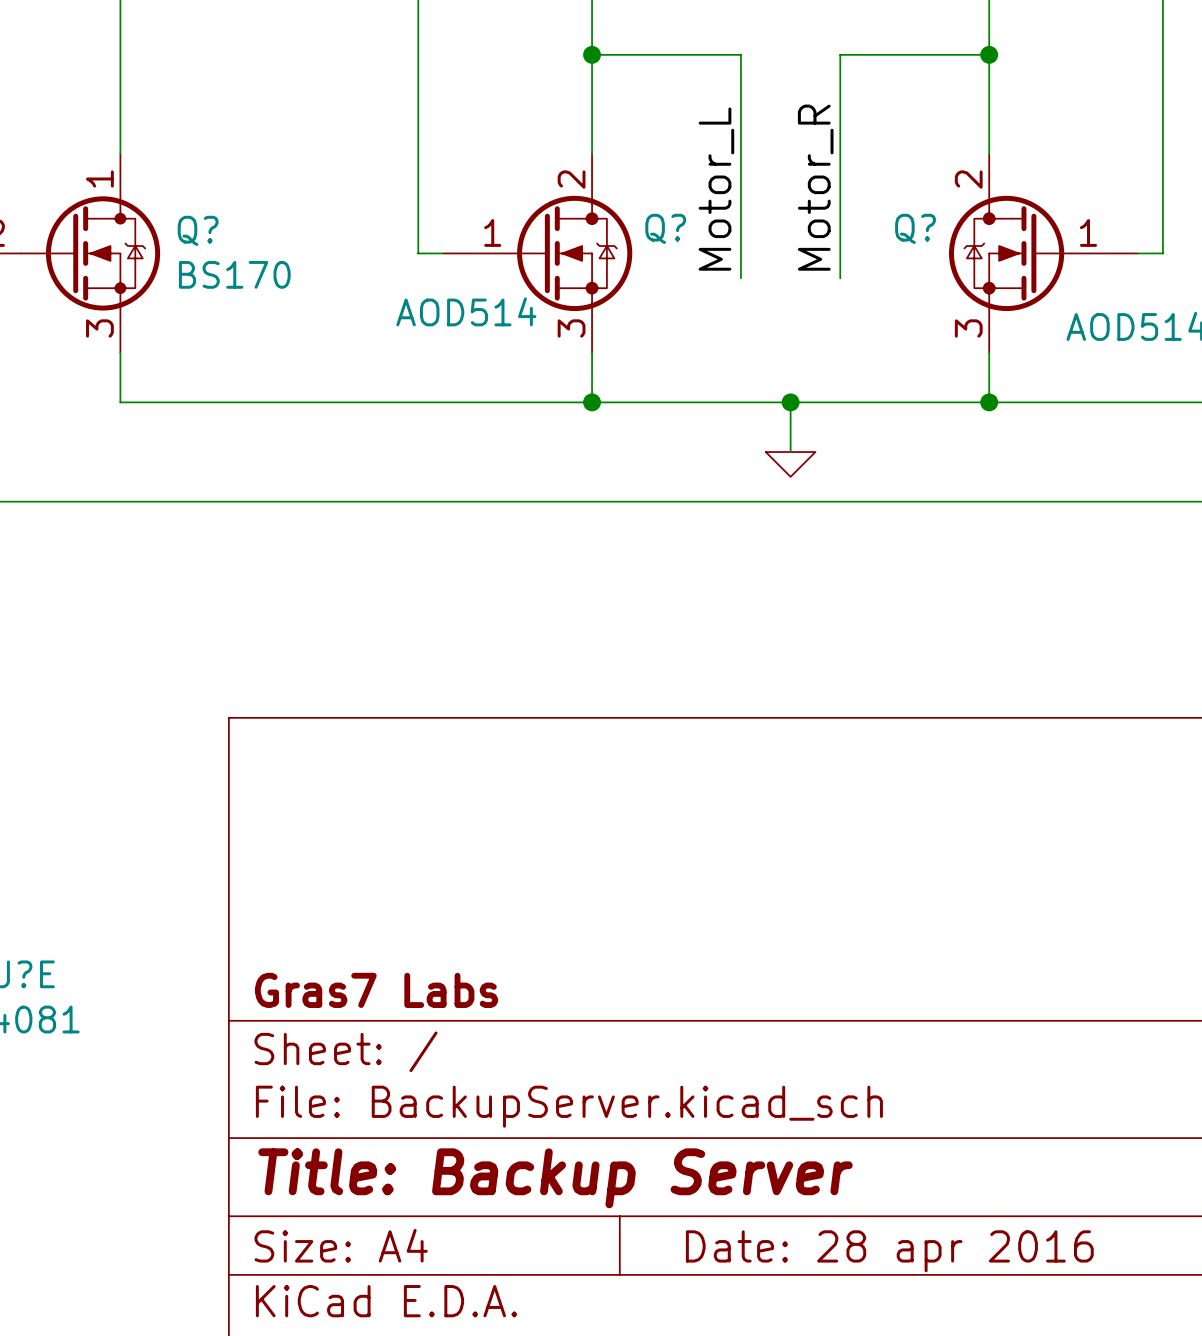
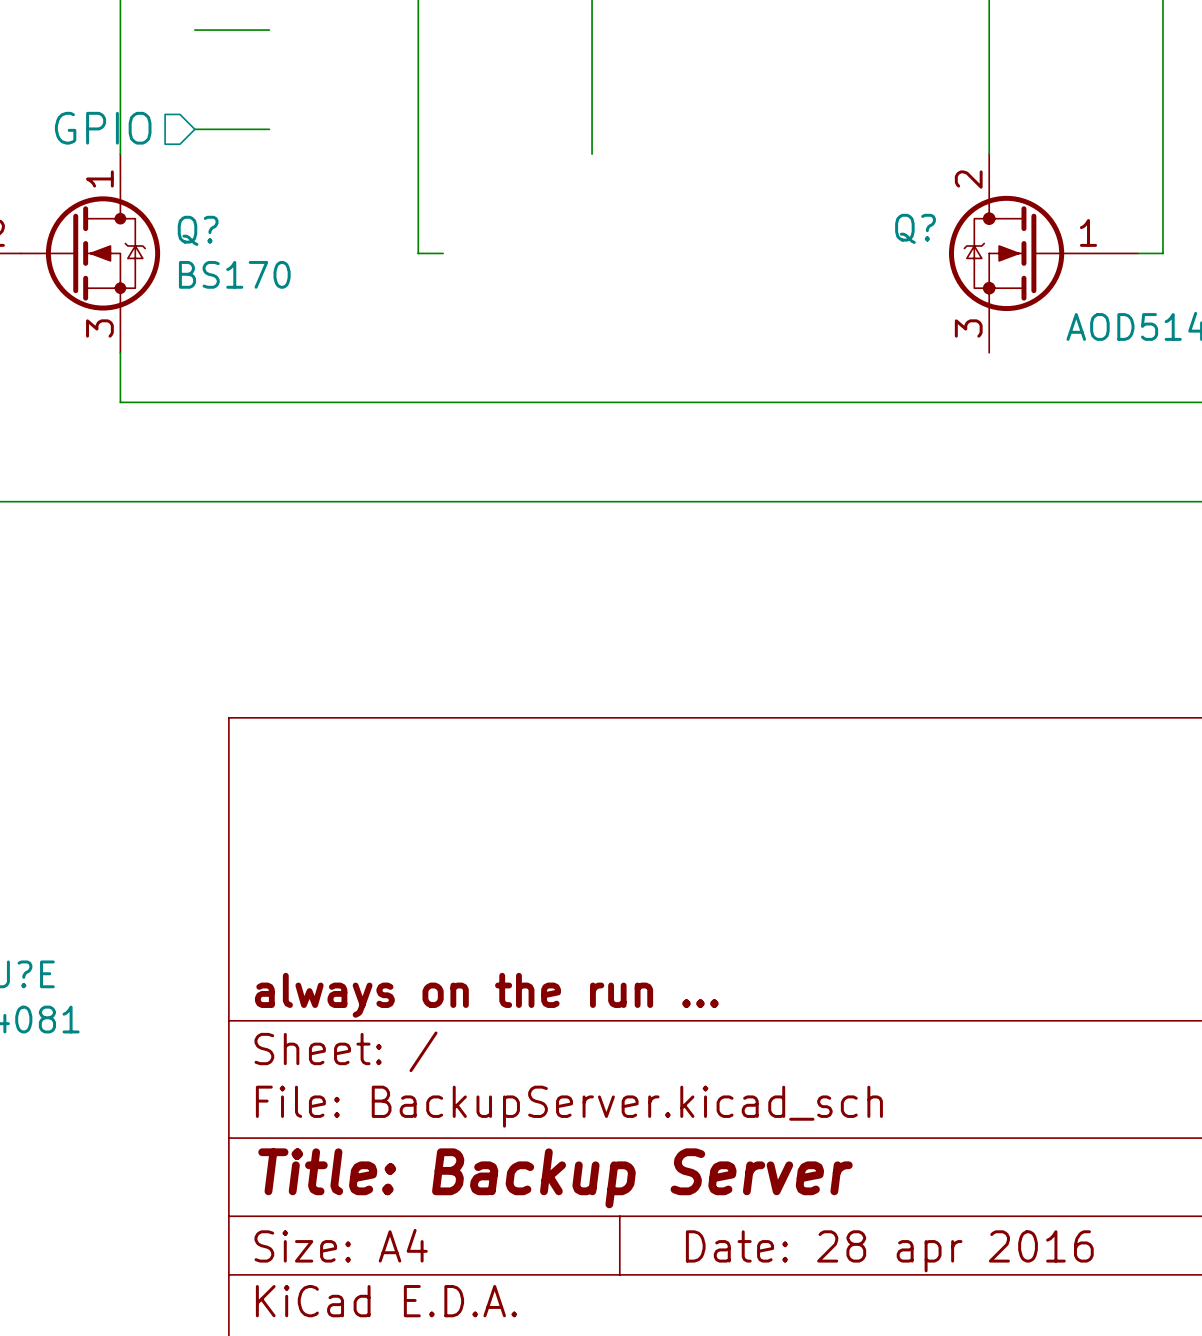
wire: none -> (194, 30) (269, 30)
wire: (592, 54) (740, 54) (740, 278) -> none
junction: (592, 54) -> none
wire: (989, 54) (840, 54) (840, 278) -> none
junction: (989, 54) -> none
sheet pin: none -> GPIO (103, 128)
wire: none -> (194, 129) (269, 129)
label: Motor_R (815, 187) -> none
label: Motor_L (716, 189) -> none
Q?: AOD514 (537, 253) -> none
wire: (592, 352) (592, 402) -> none
wire: (989, 352) (989, 402) -> none
junction: (592, 402) -> none
wire: (790, 402) (790, 452) -> none
junction: (790, 402) -> none
junction: (989, 402) -> none
power symbol: (790, 464) -> none
title block: Gras7 Labs (376, 990) -> always on the run ... (486, 995)

